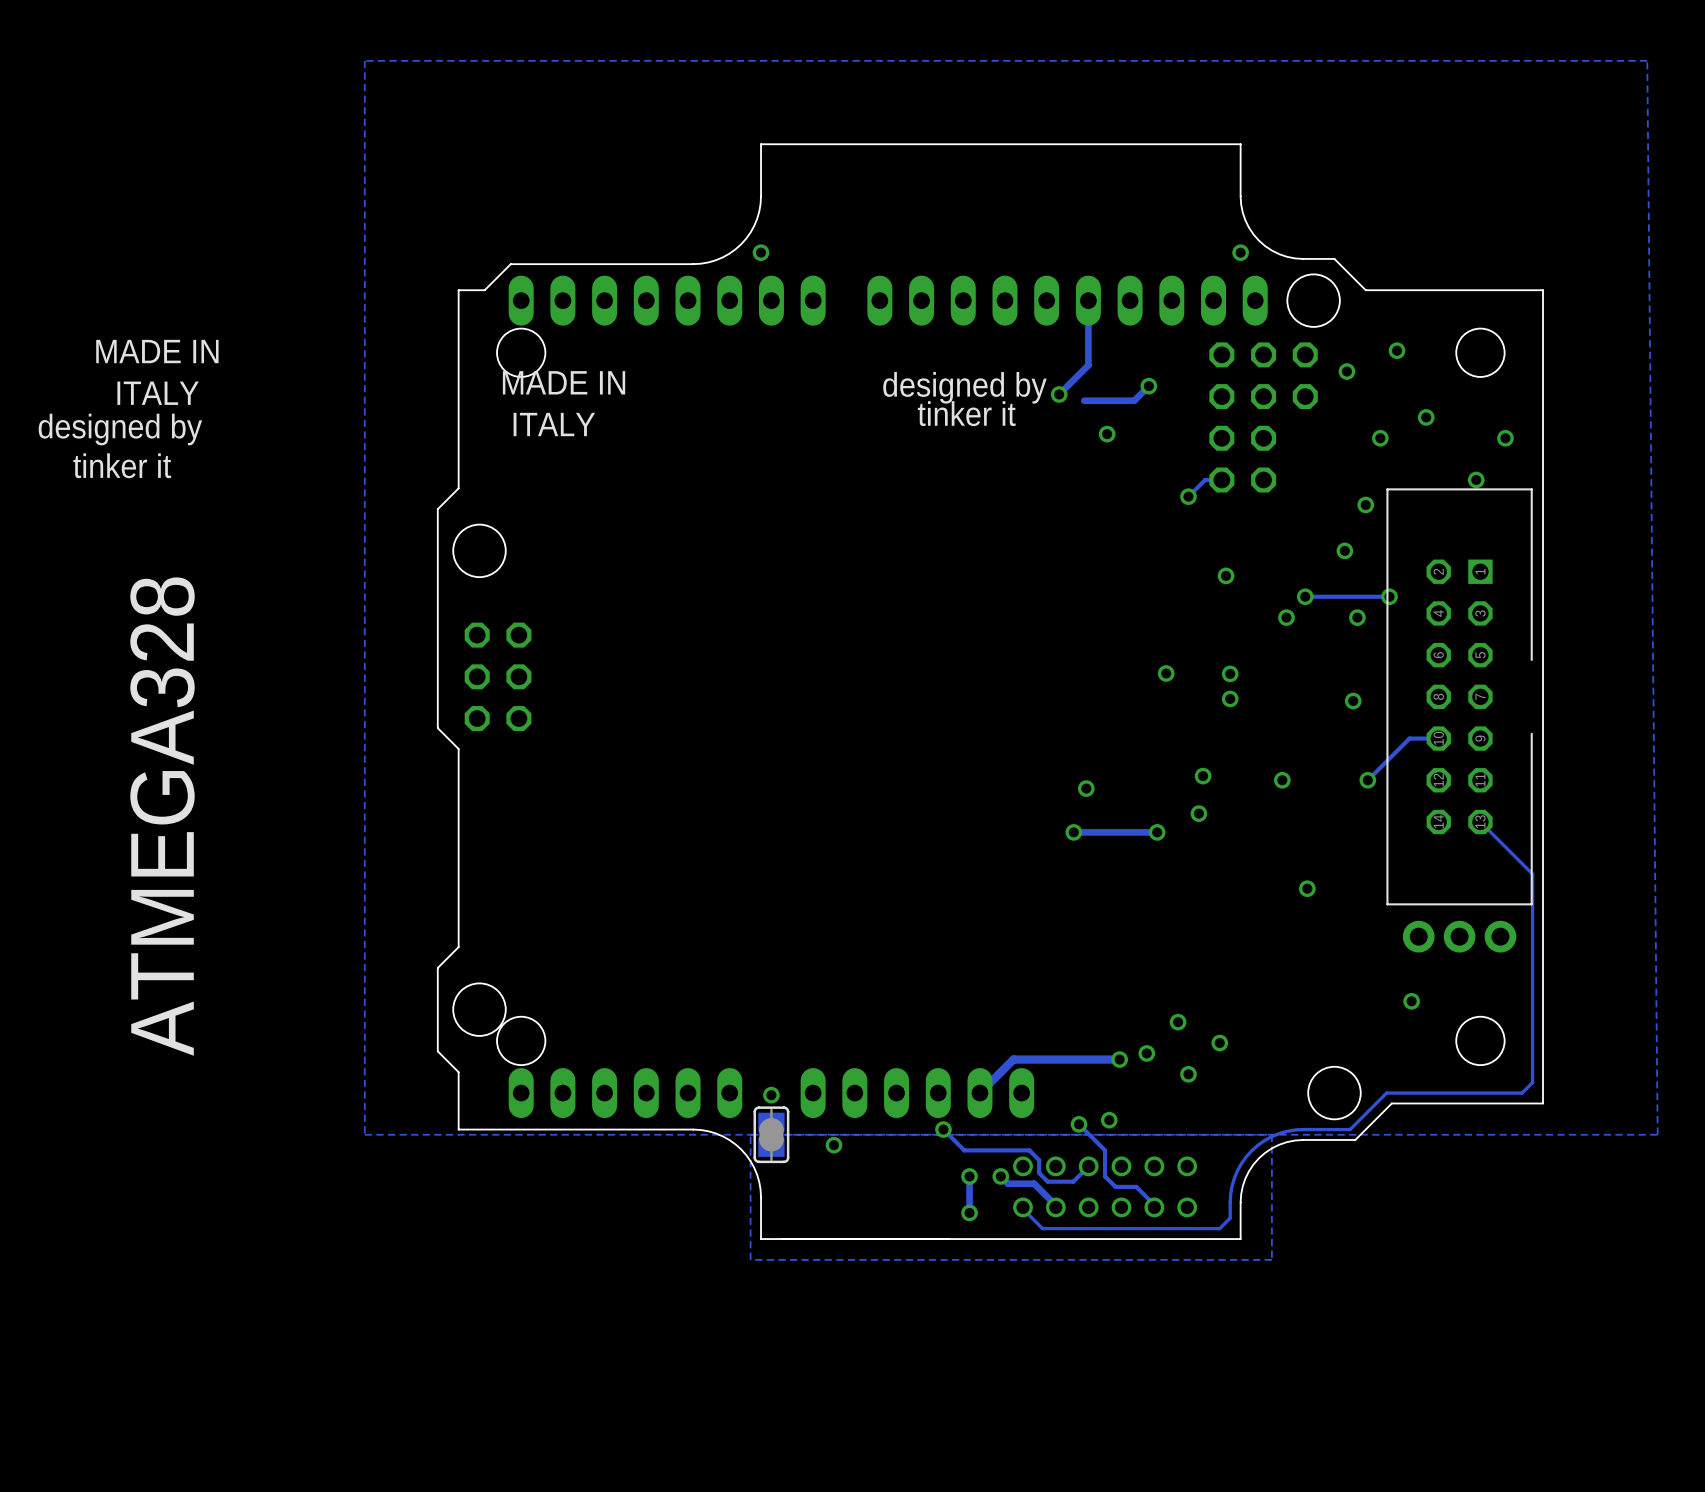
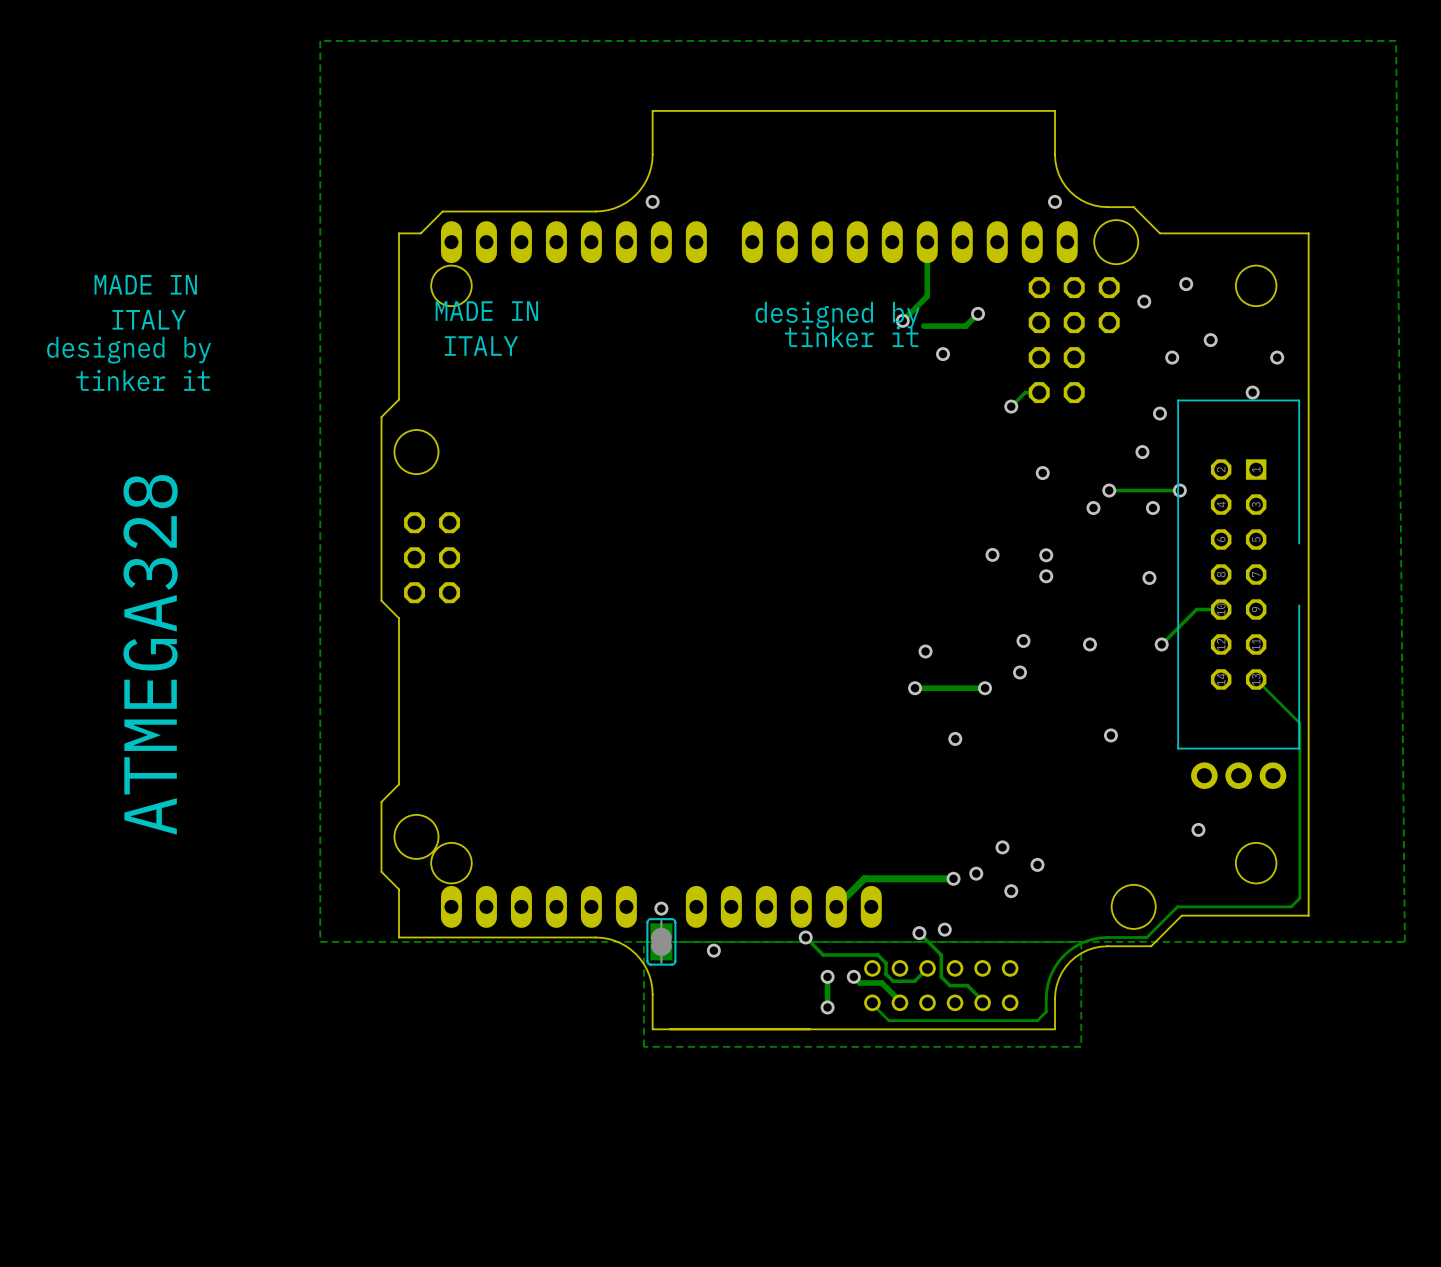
via: none -> (955, 738)

